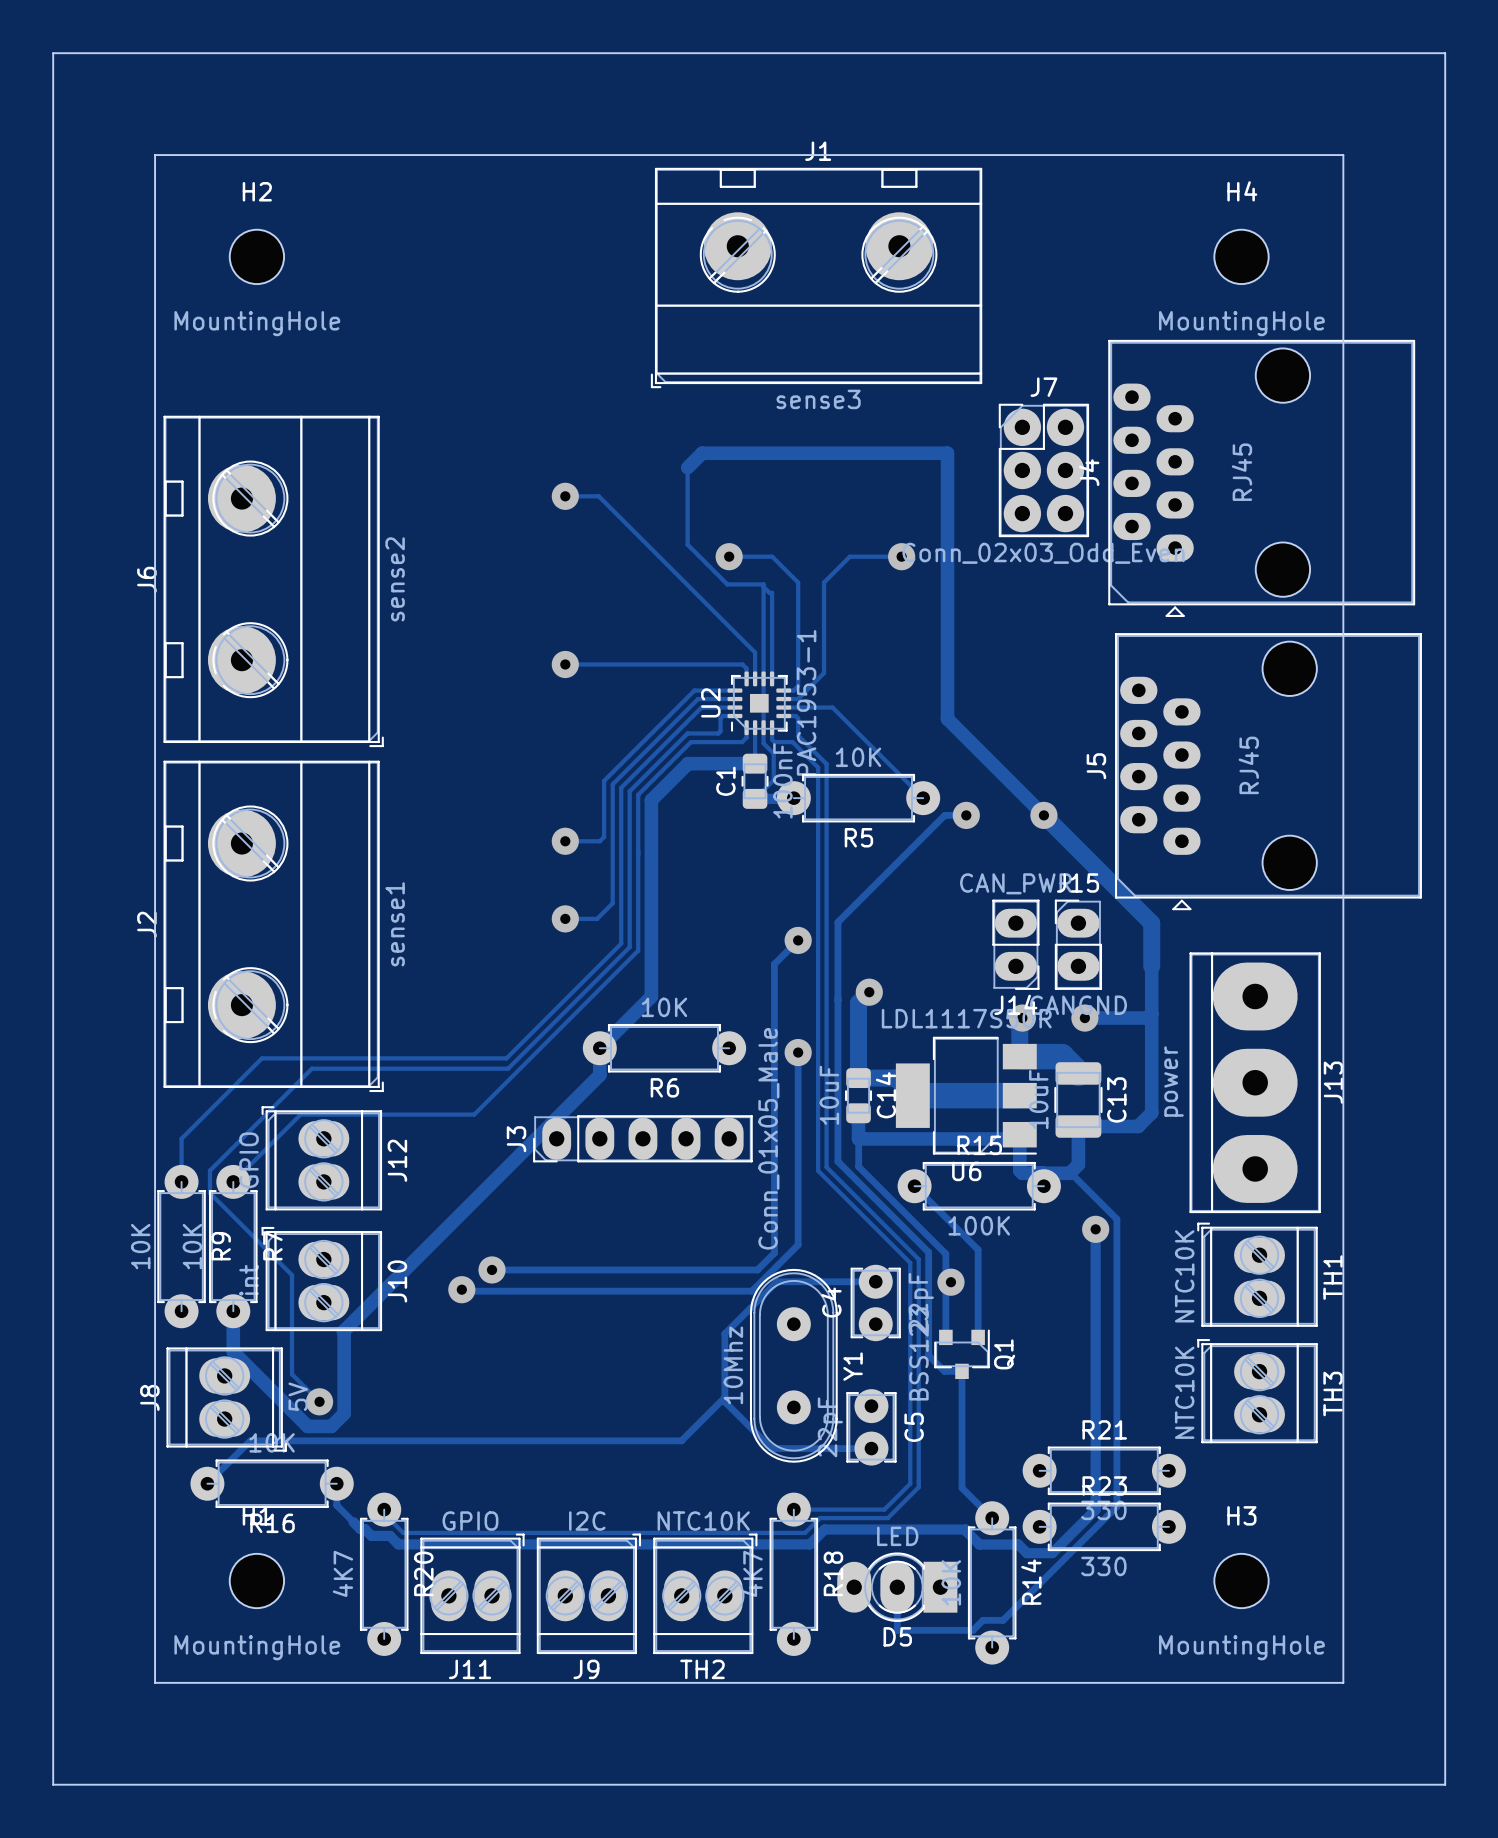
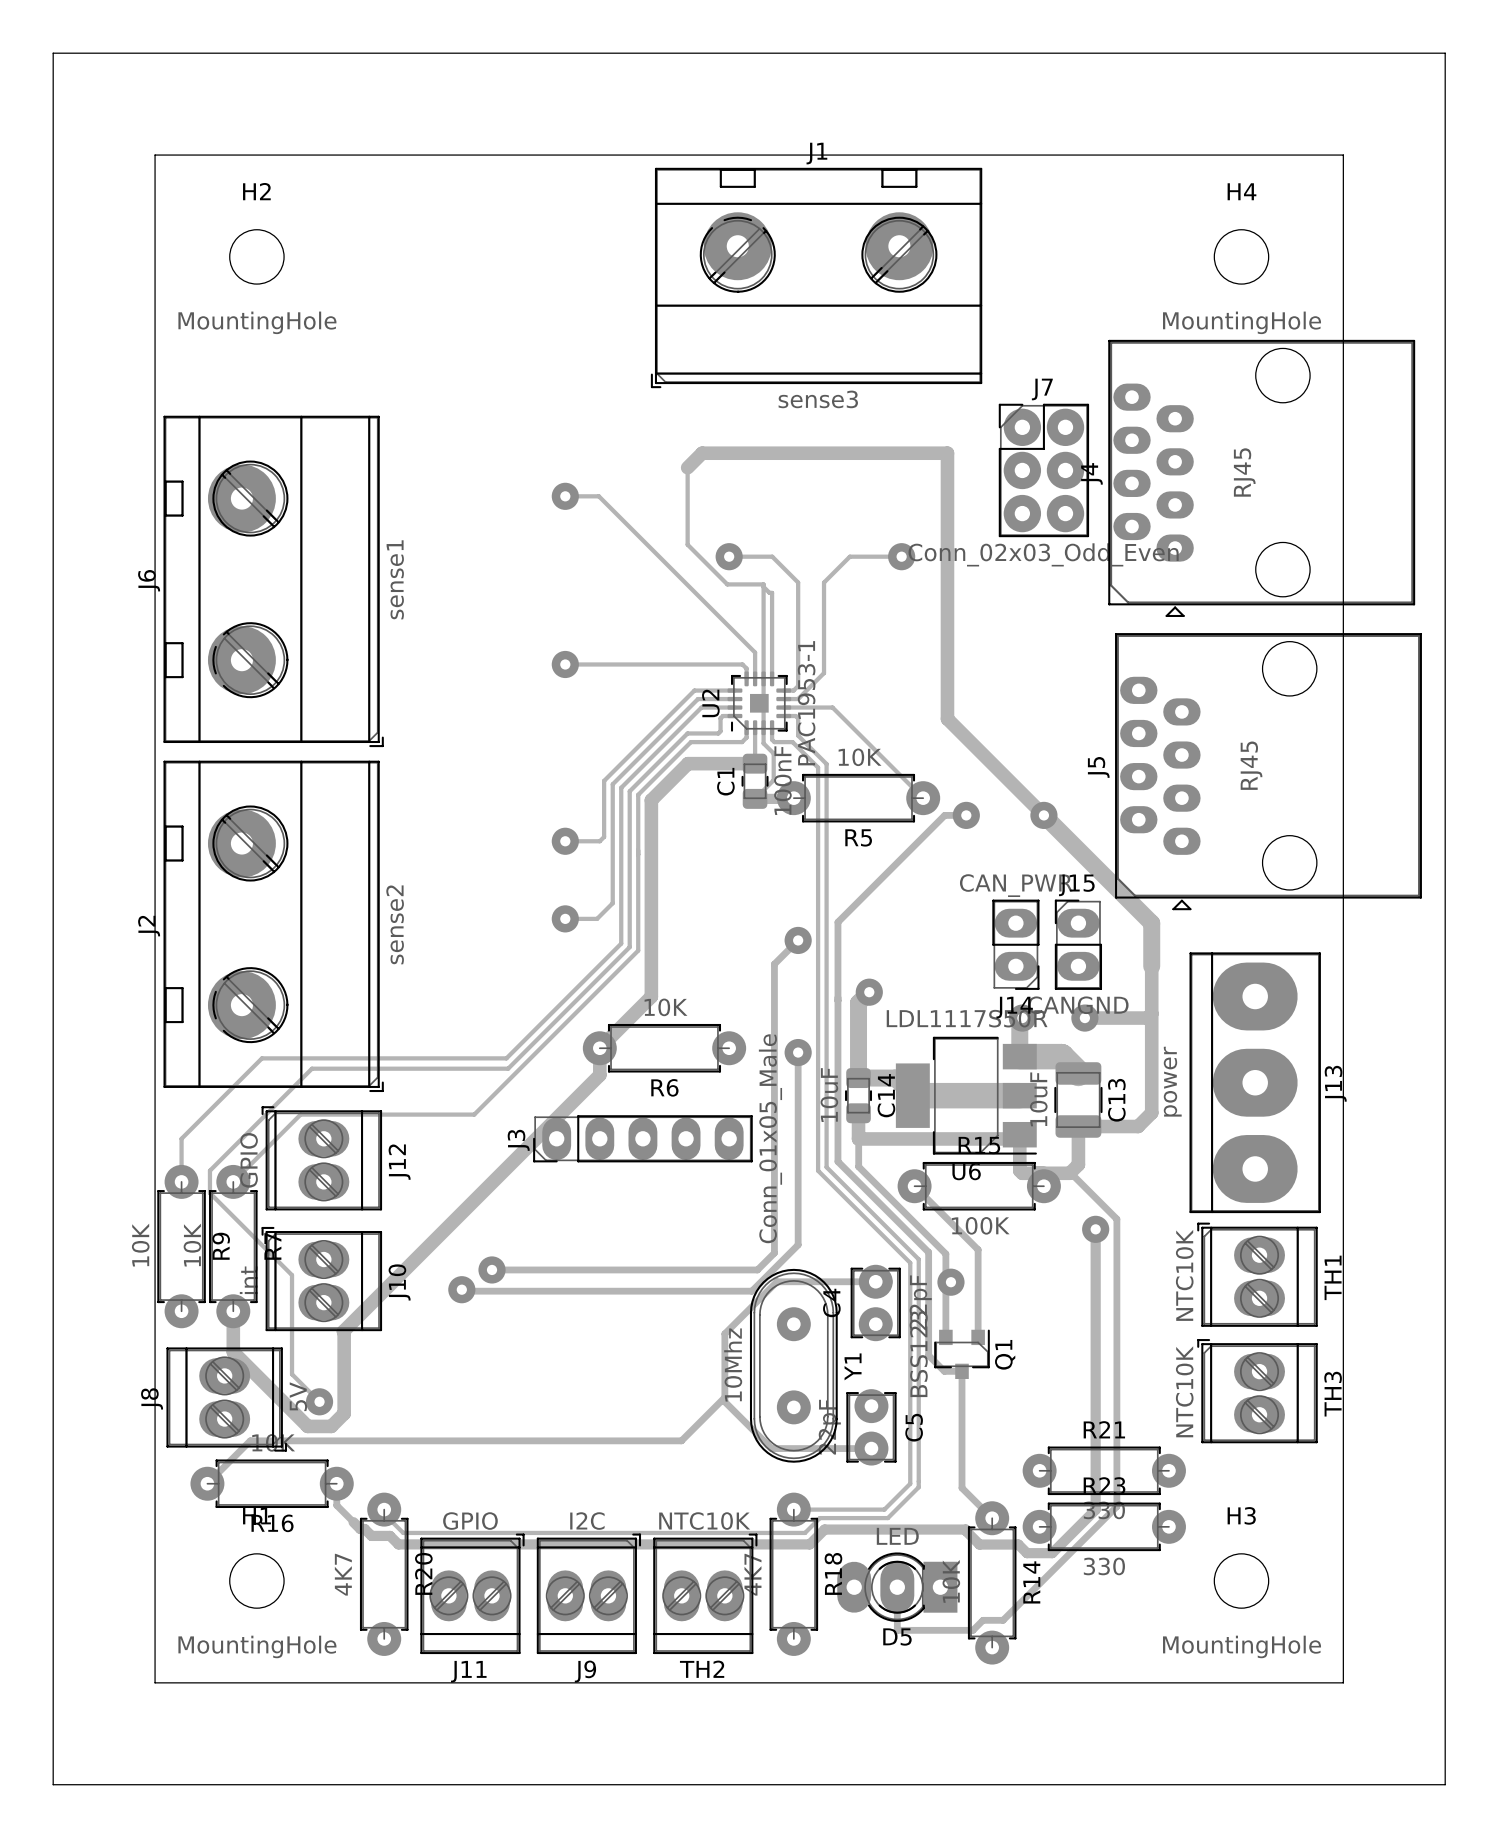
J6 value: sense2 (395, 579) -> sense1 (395, 579)
J2 value: sense1 (395, 924) -> sense2 (395, 924)

